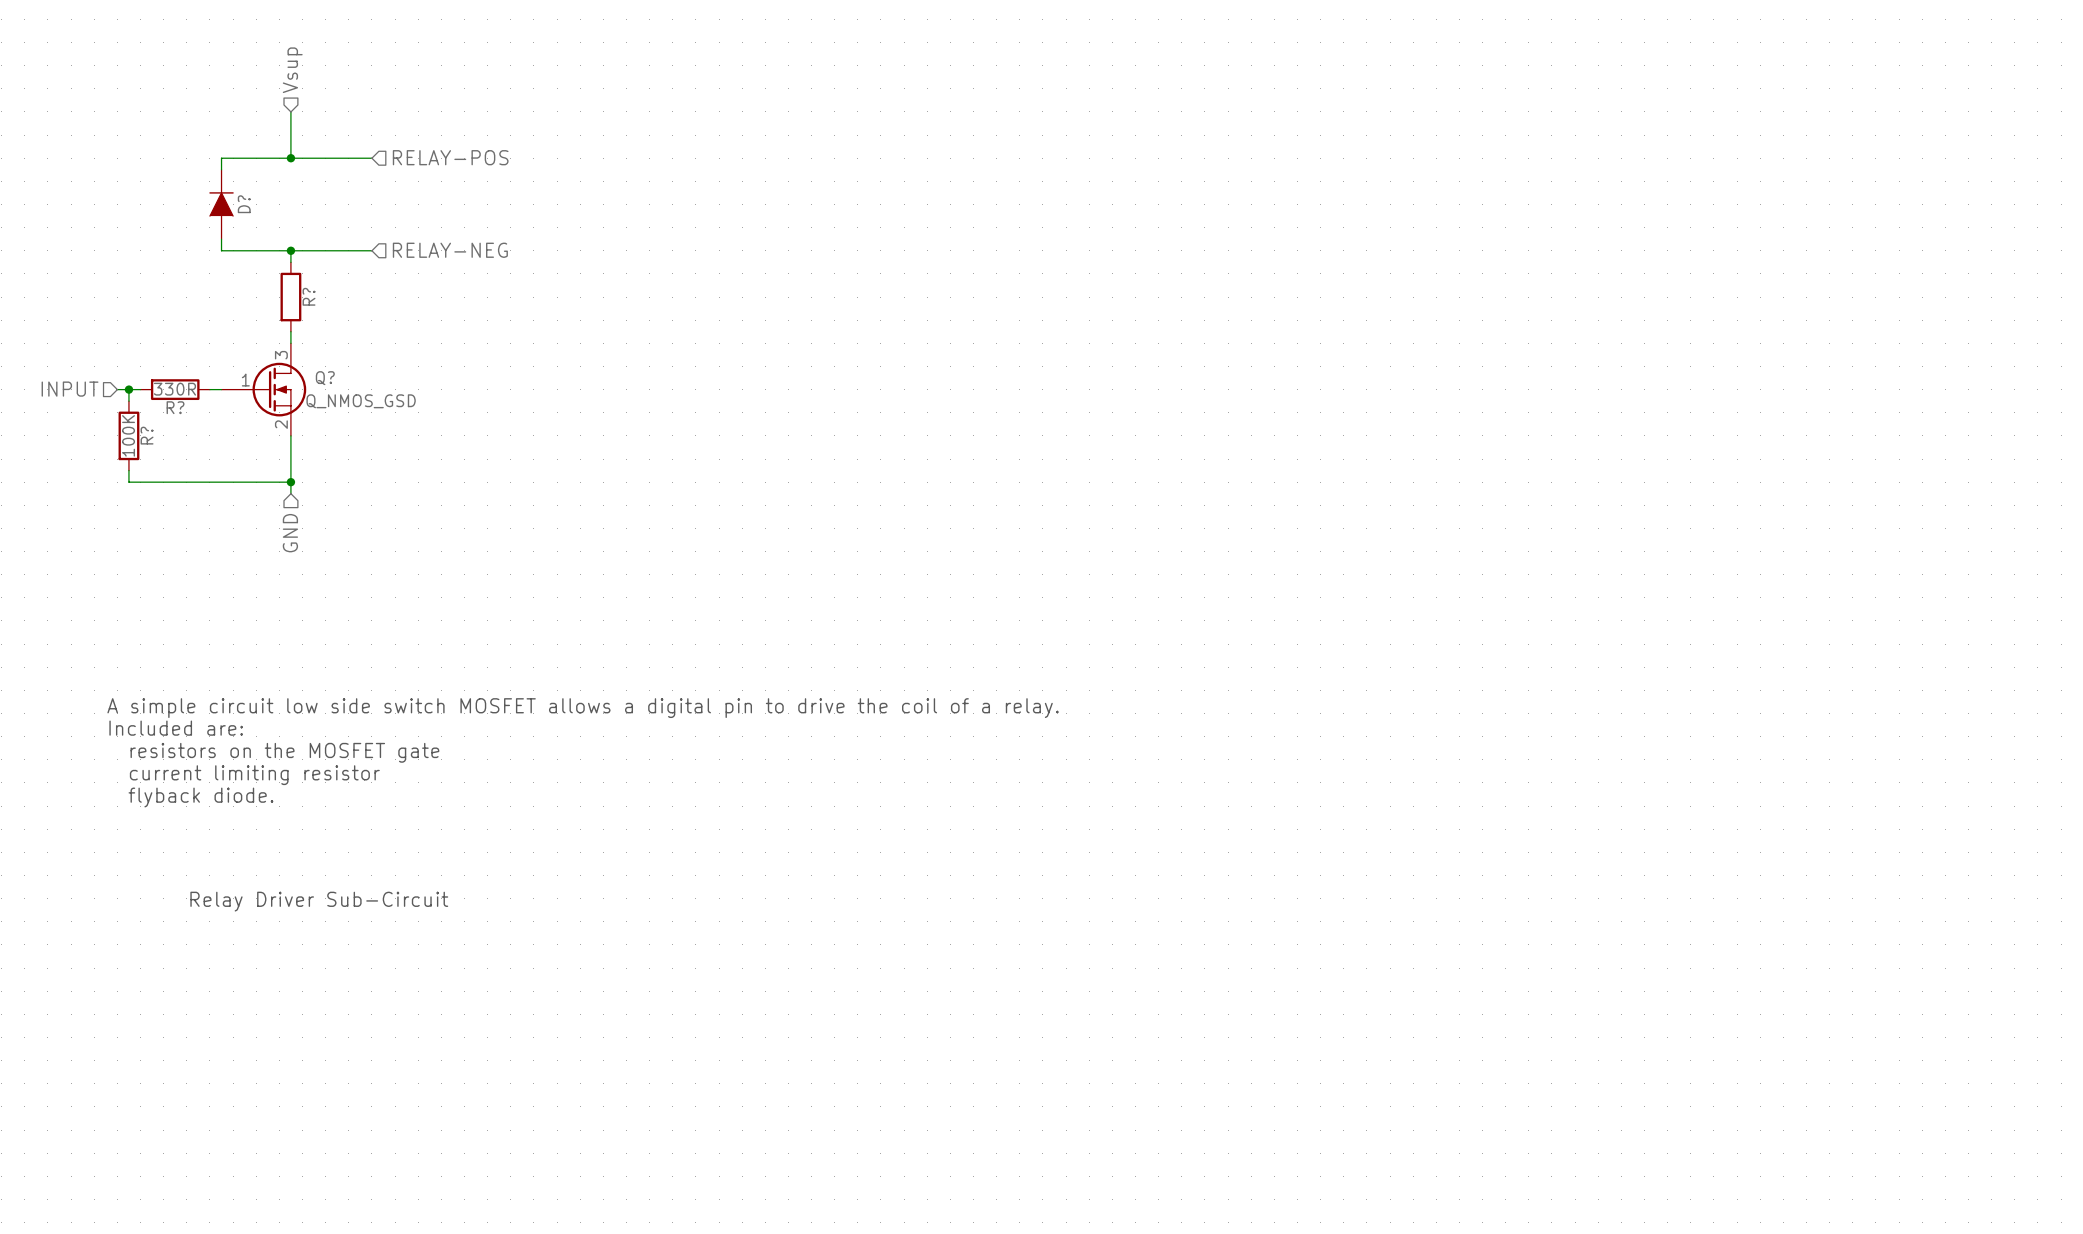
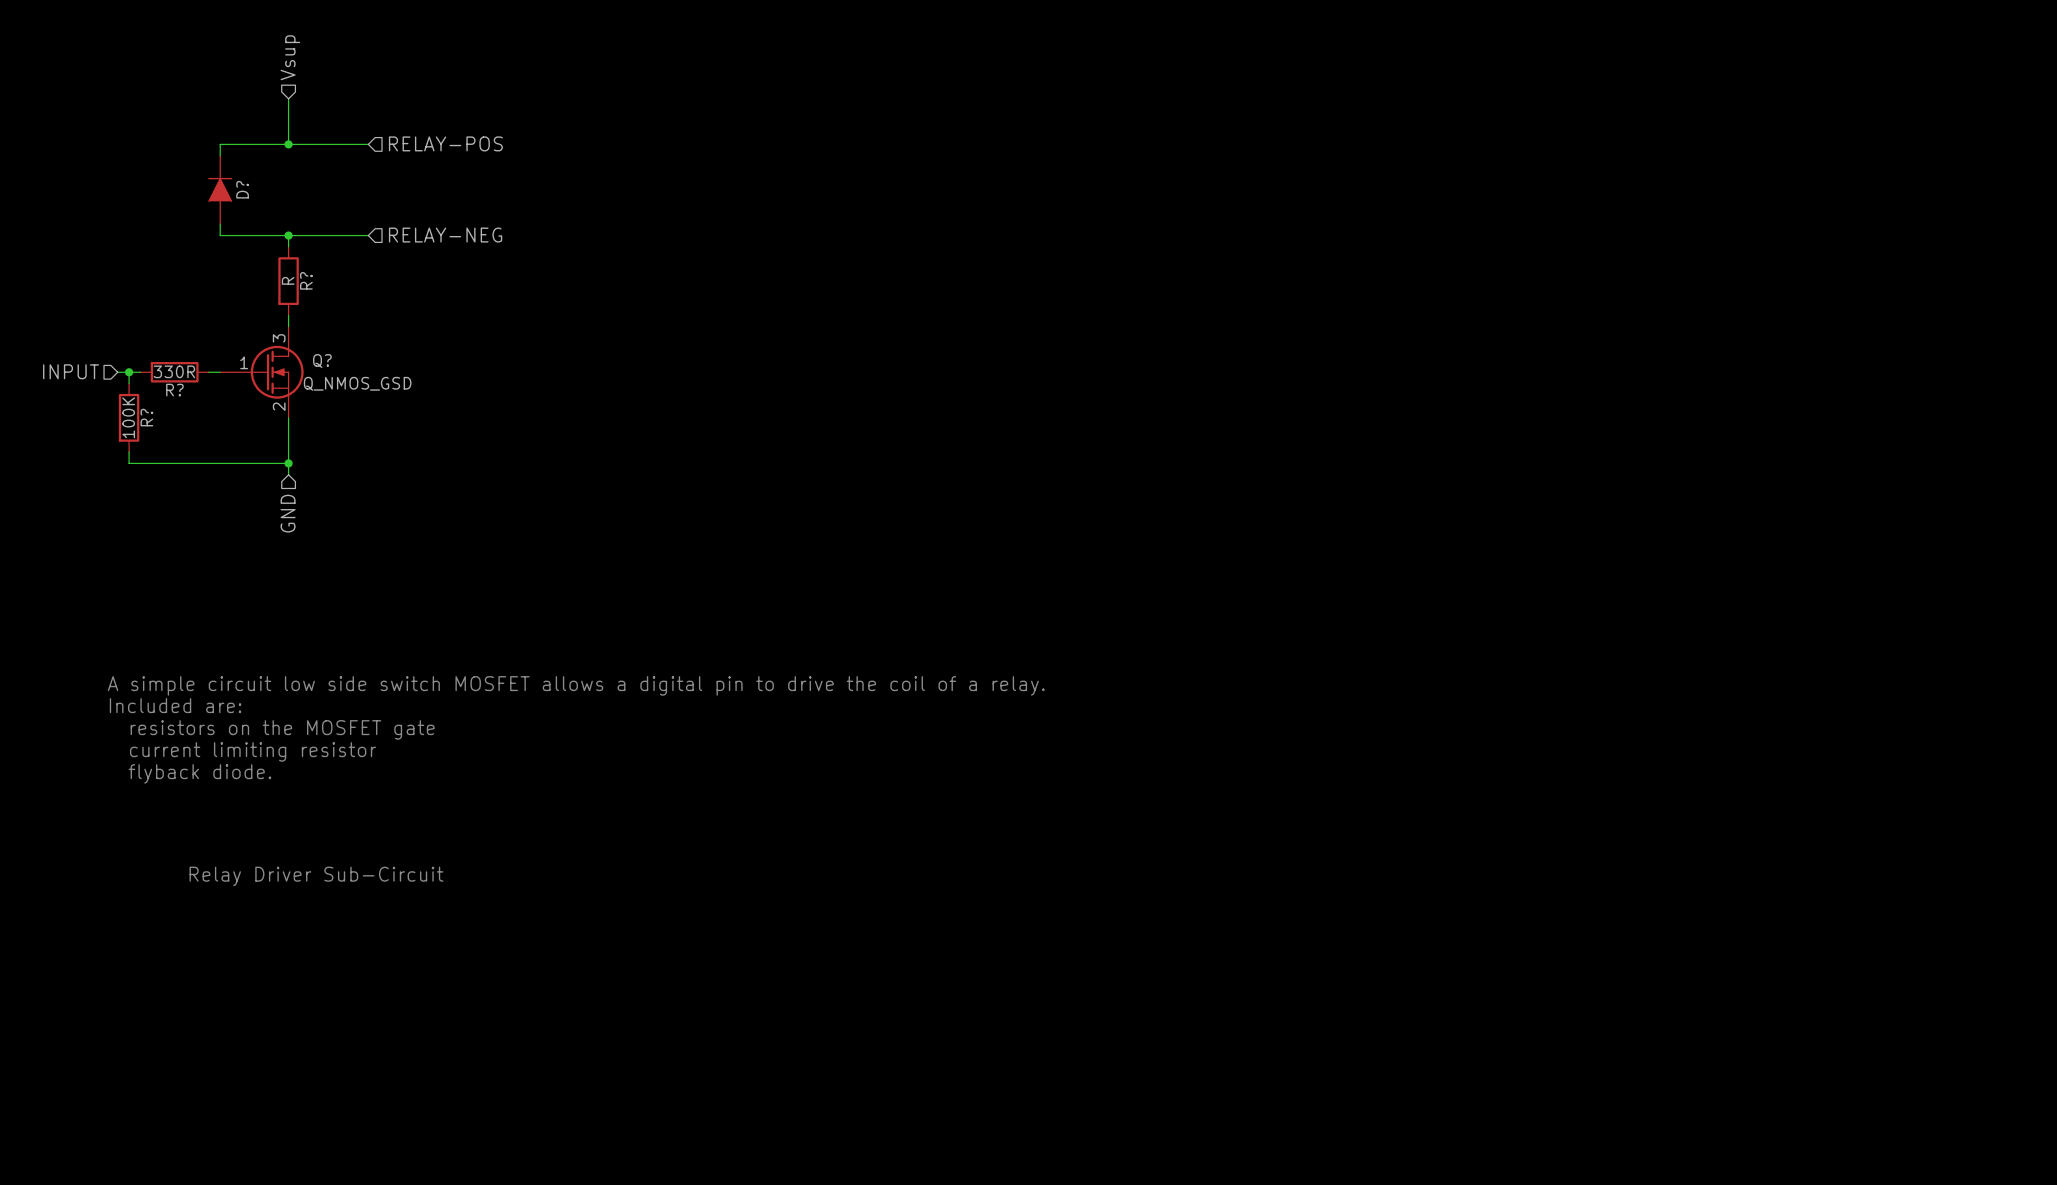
R? value: none -> R (288, 280)

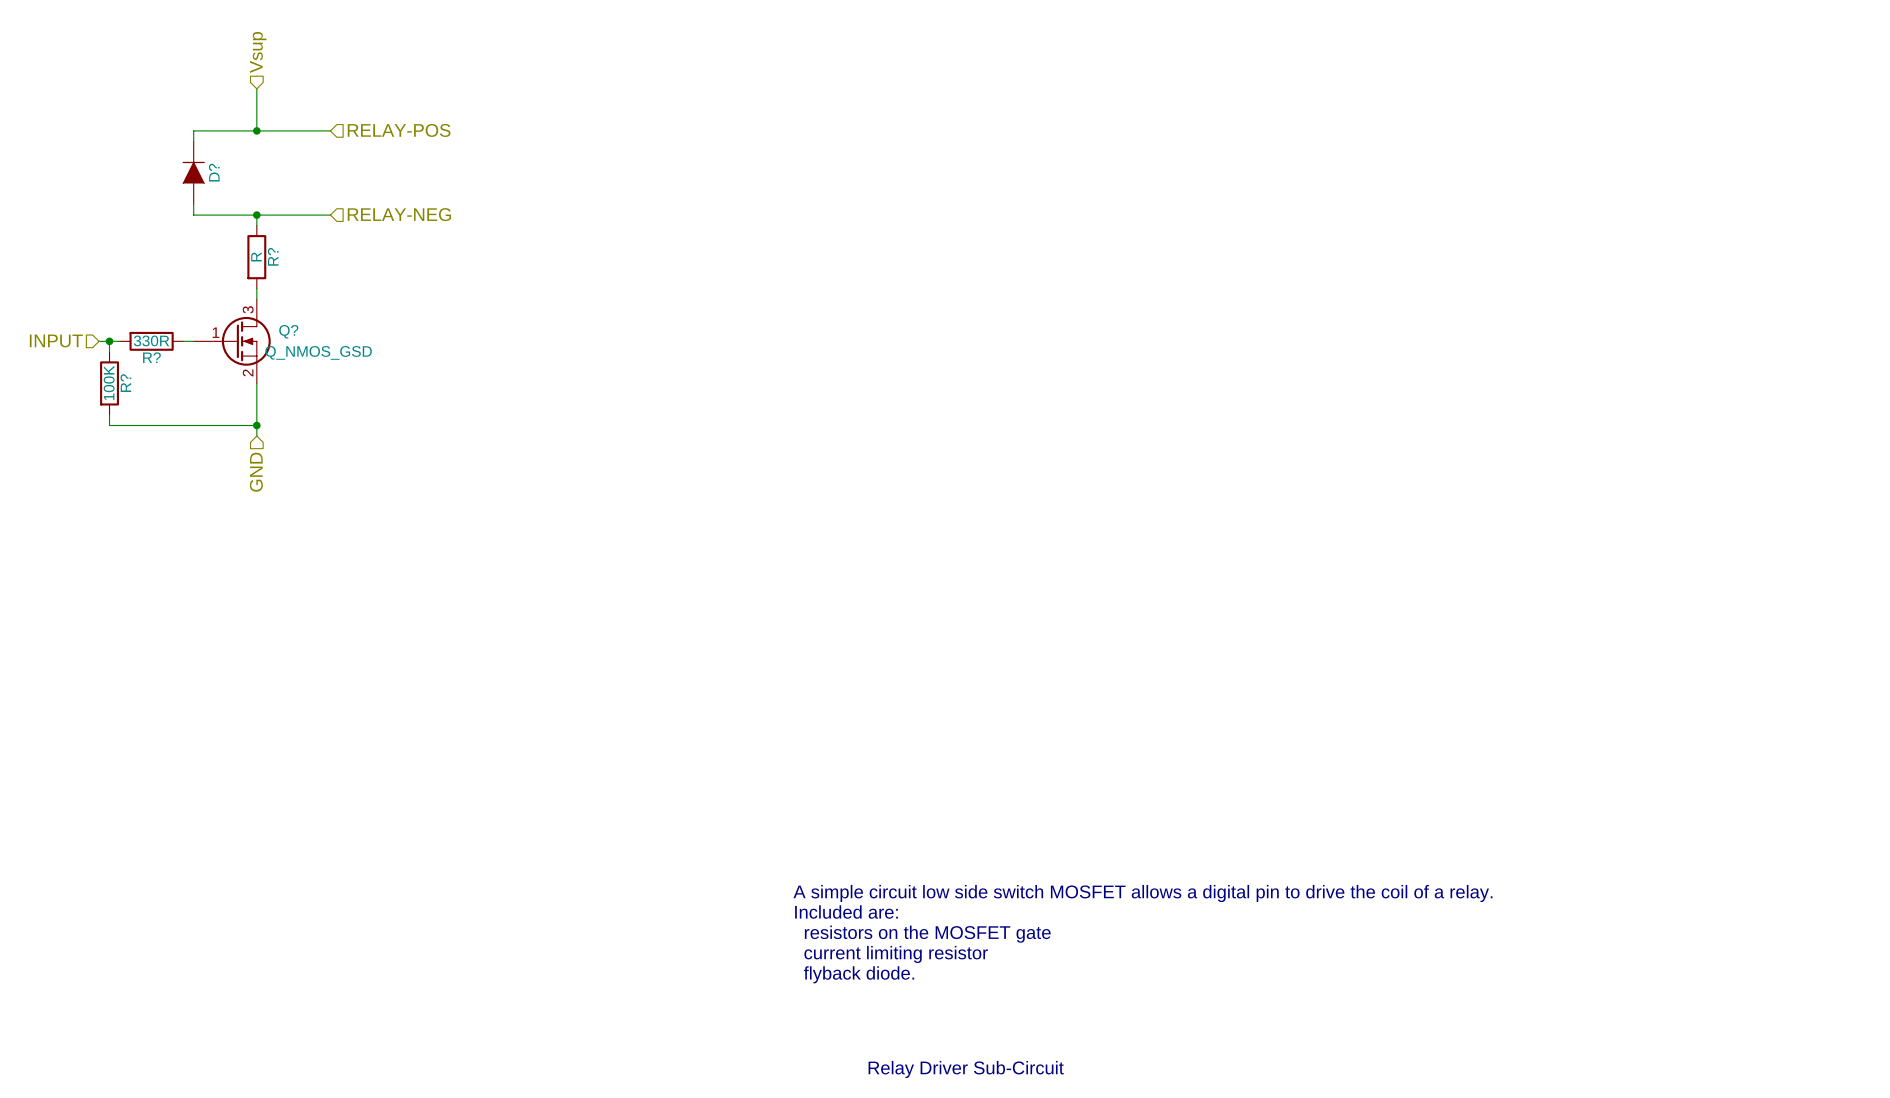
text: A simple circuit low side switch MOSFET allows a digital pin to drive the coil of a relay. (576, 685) -> none
text: Included are: (175, 705) -> none
text: resistors on the MOSFET gate (282, 729) -> none
text: current limiting resistor (253, 751) -> none
text: flyback diode. (199, 773) -> none
text: Relay Driver Sub-Circuit (316, 876) -> none
text: none -> A simple circuit low side switch MOSFET allows a digital pin to drive the coil of a relay. (1142, 893)
text: none -> Included are: (846, 912)
text: none -> resistors on the MOSFET gate (927, 934)
text: none -> current limiting resistor (896, 954)
text: none -> flyback diode. (859, 974)
text: none -> Relay Driver Sub-Circuit (966, 1069)

